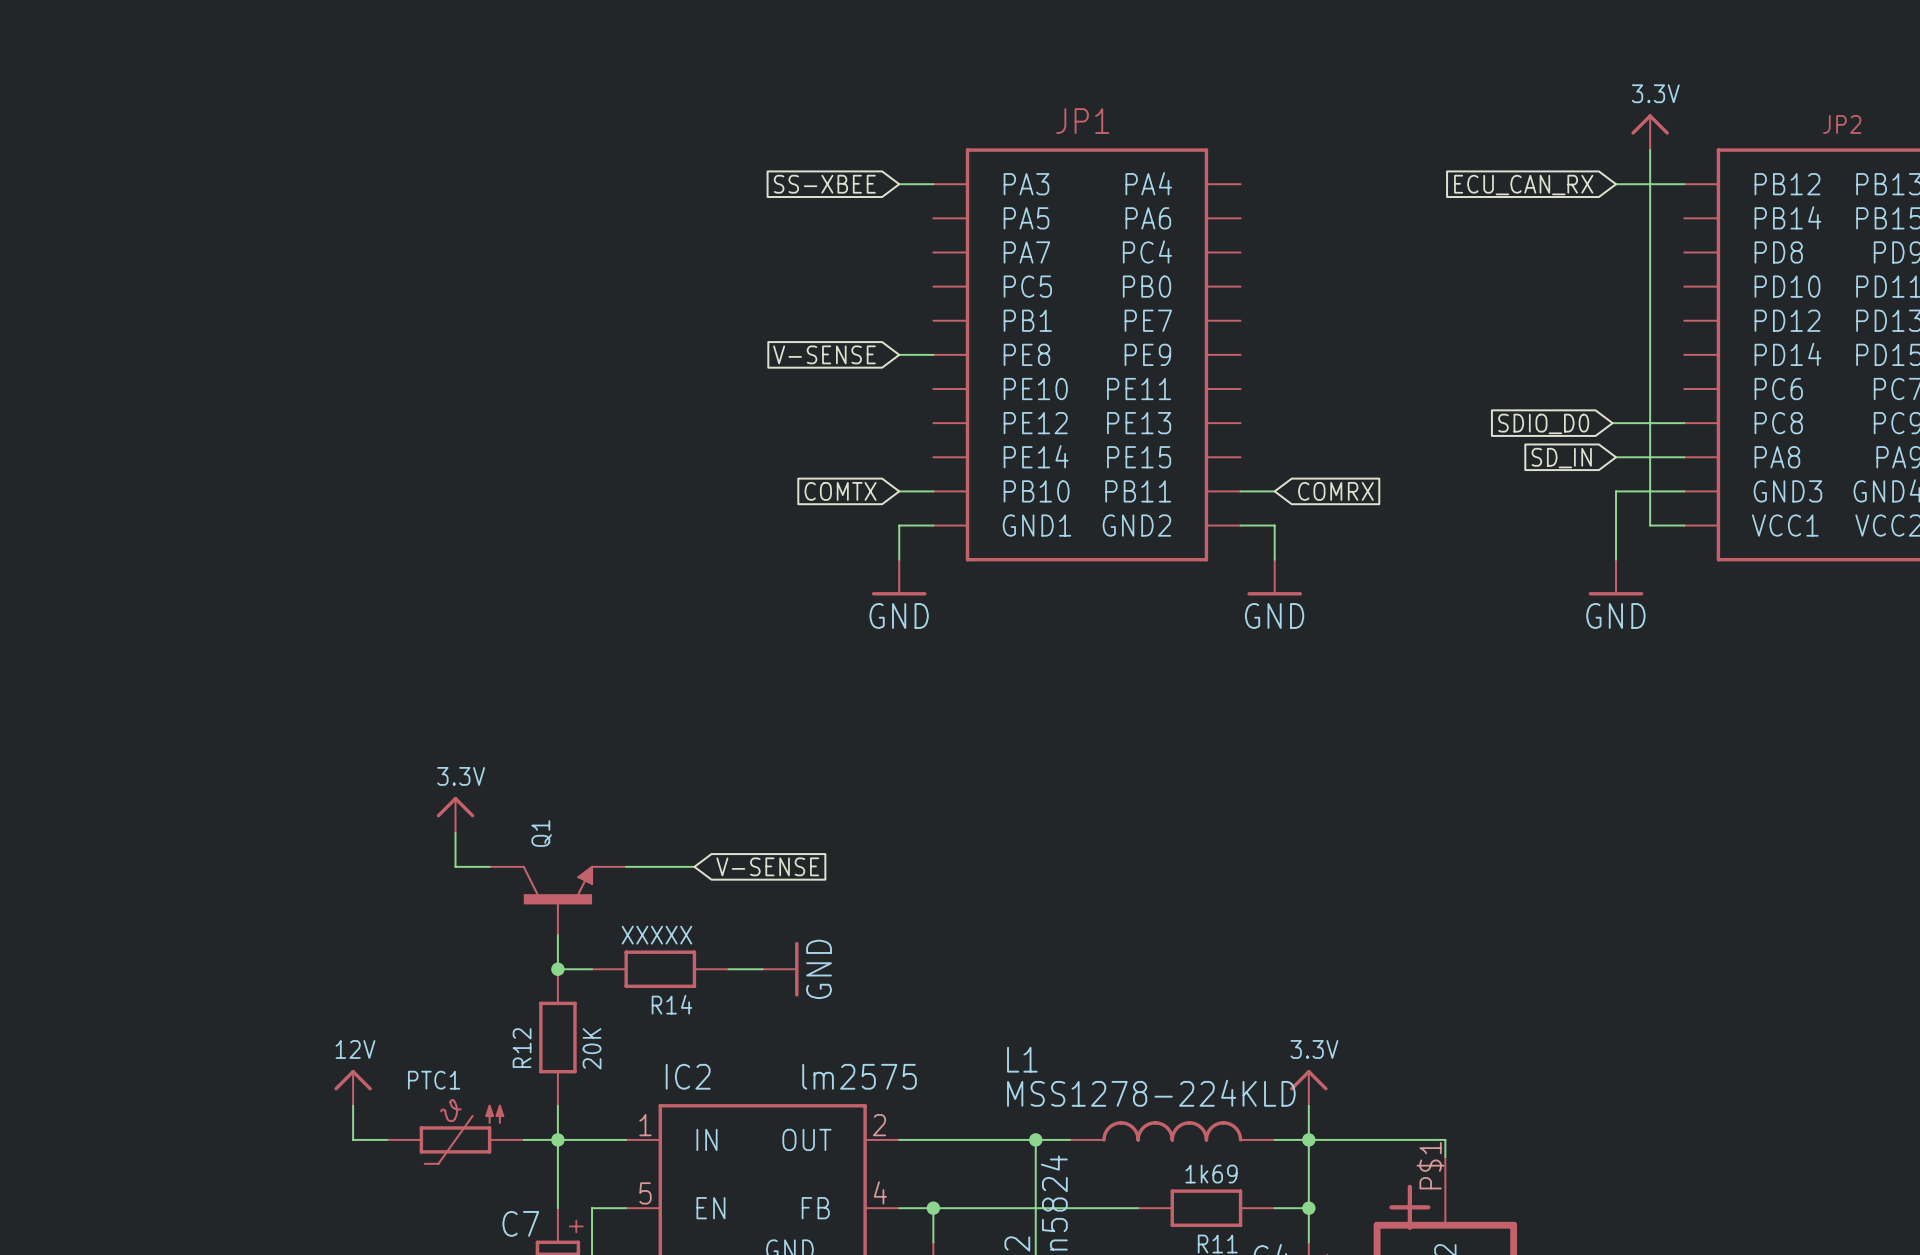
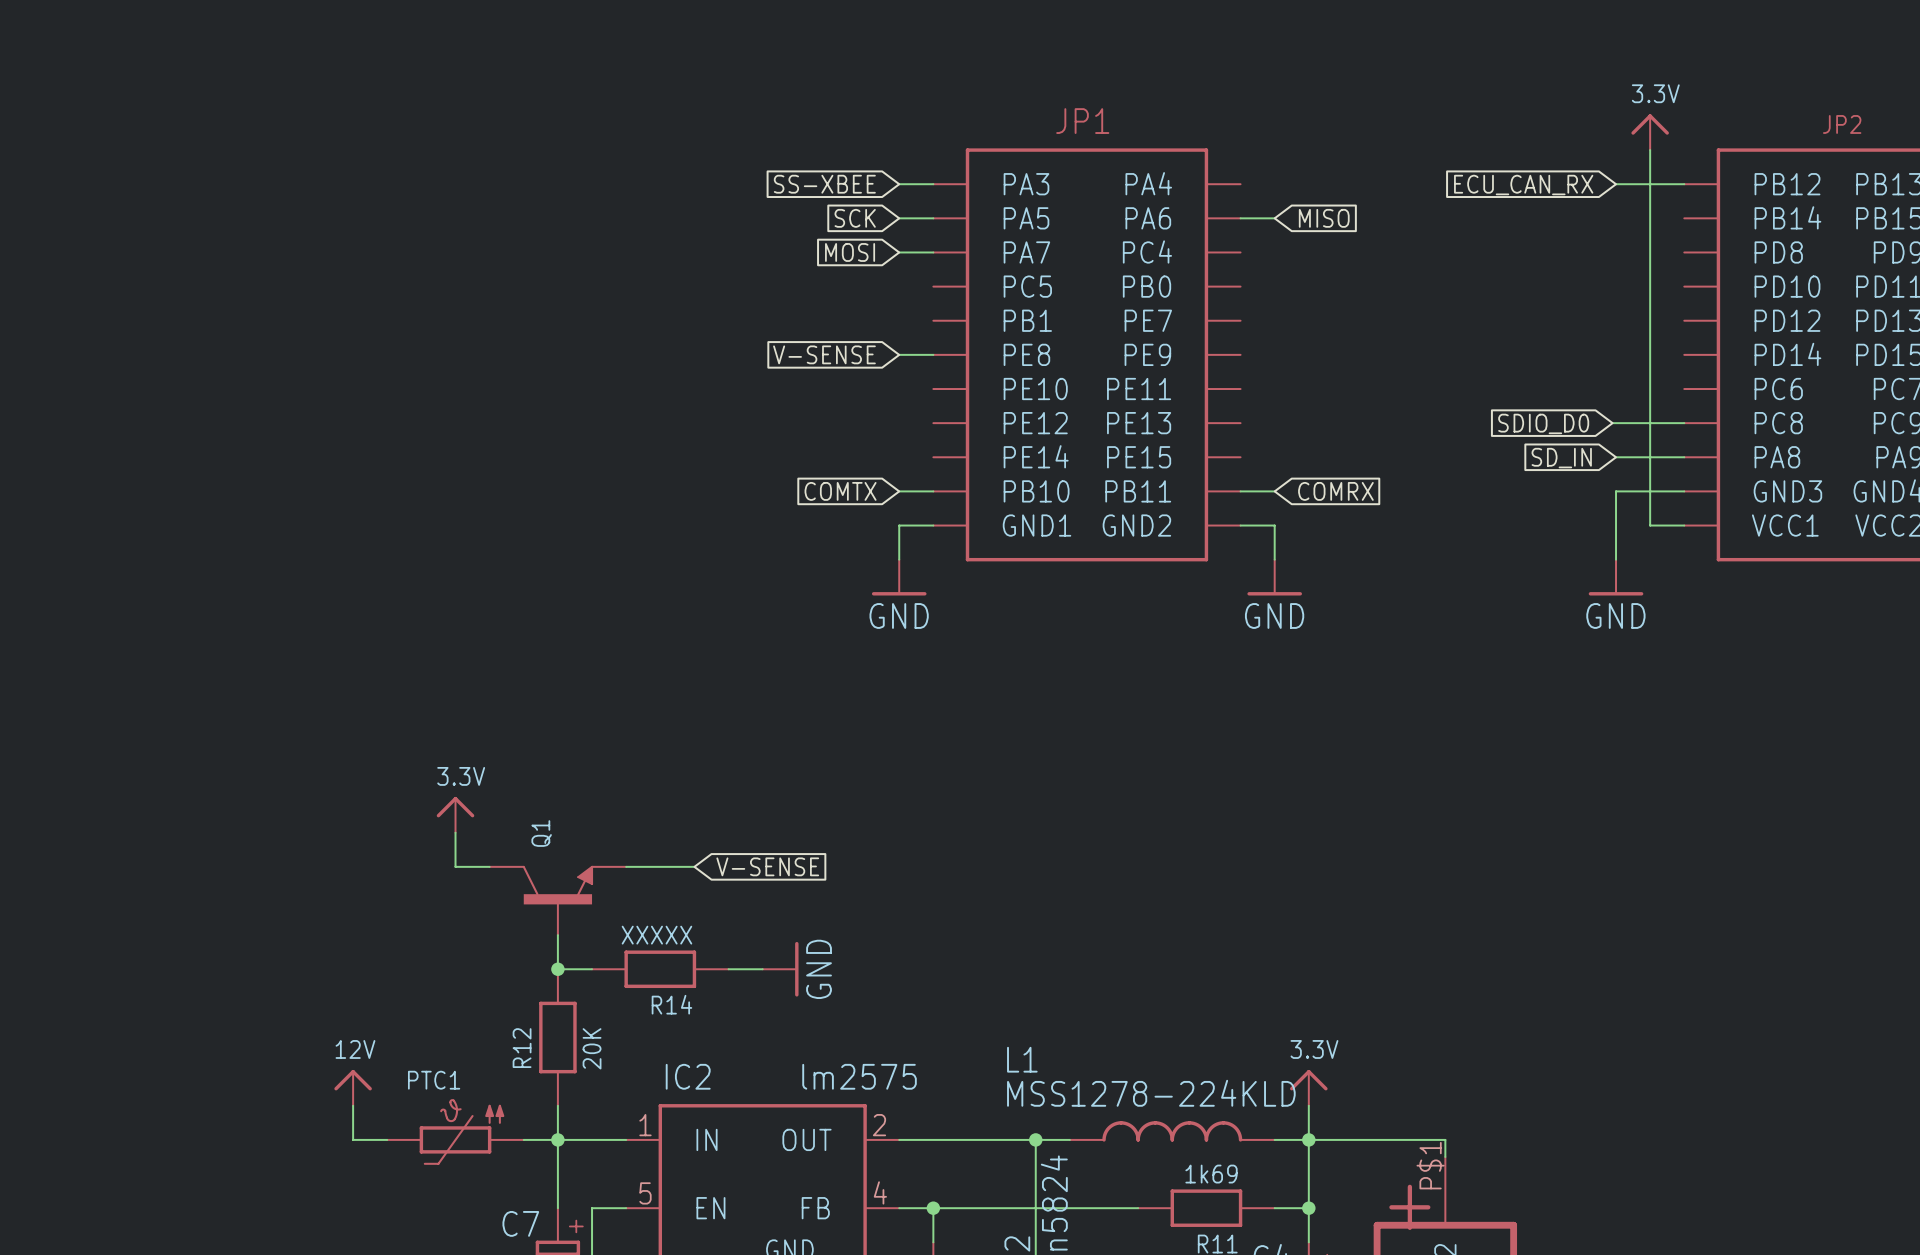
global label: none -> SCK (855, 218)
wire: none -> (899, 218) (933, 218)
wire: none -> (1240, 218) (1274, 218)
global label: none -> MISO (1324, 218)
global label: none -> MOSI (850, 252)
wire: none -> (899, 252) (933, 252)

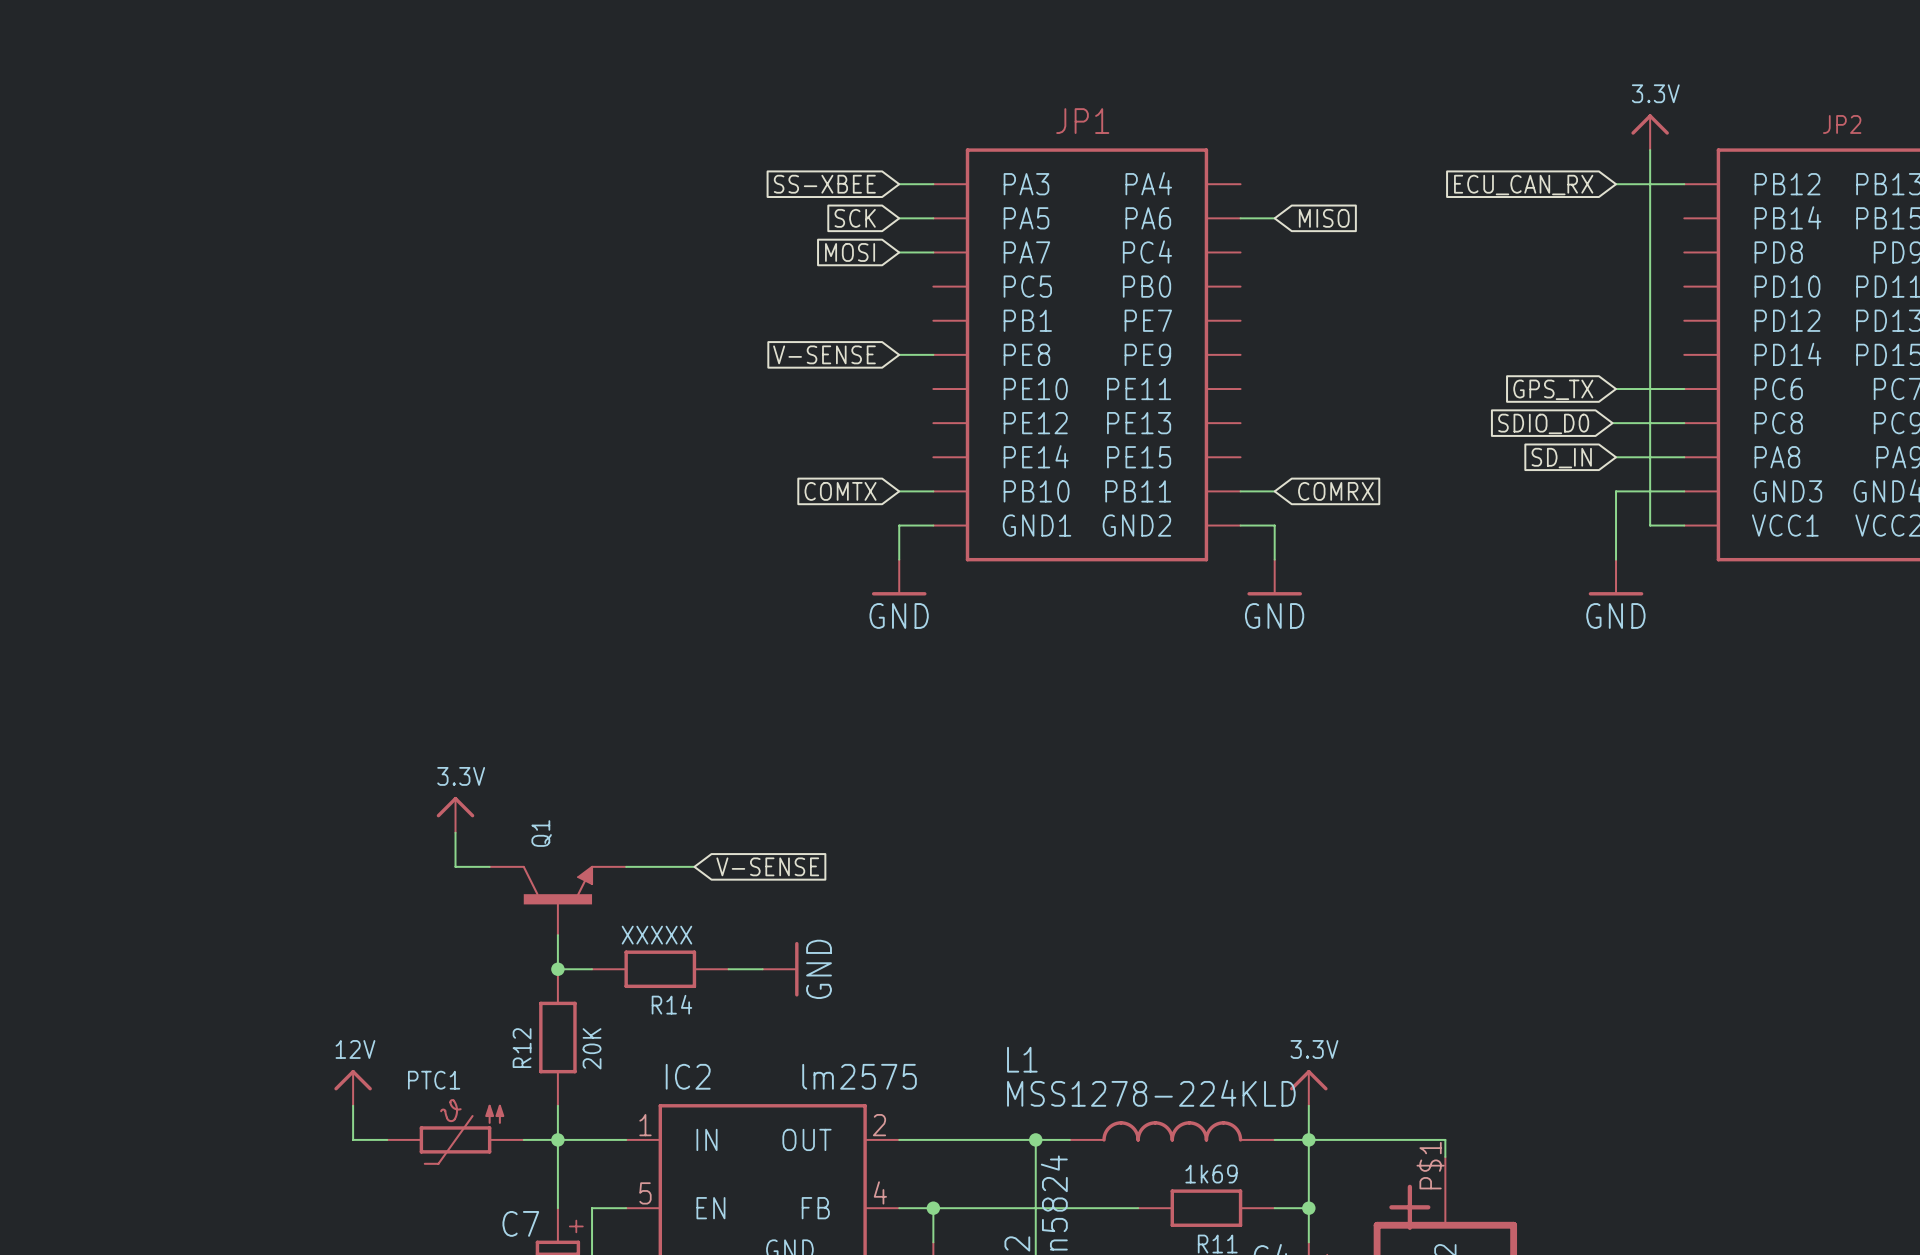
global label: none -> GPS_TX (1553, 389)
wire: none -> (1616, 389) (1684, 389)

